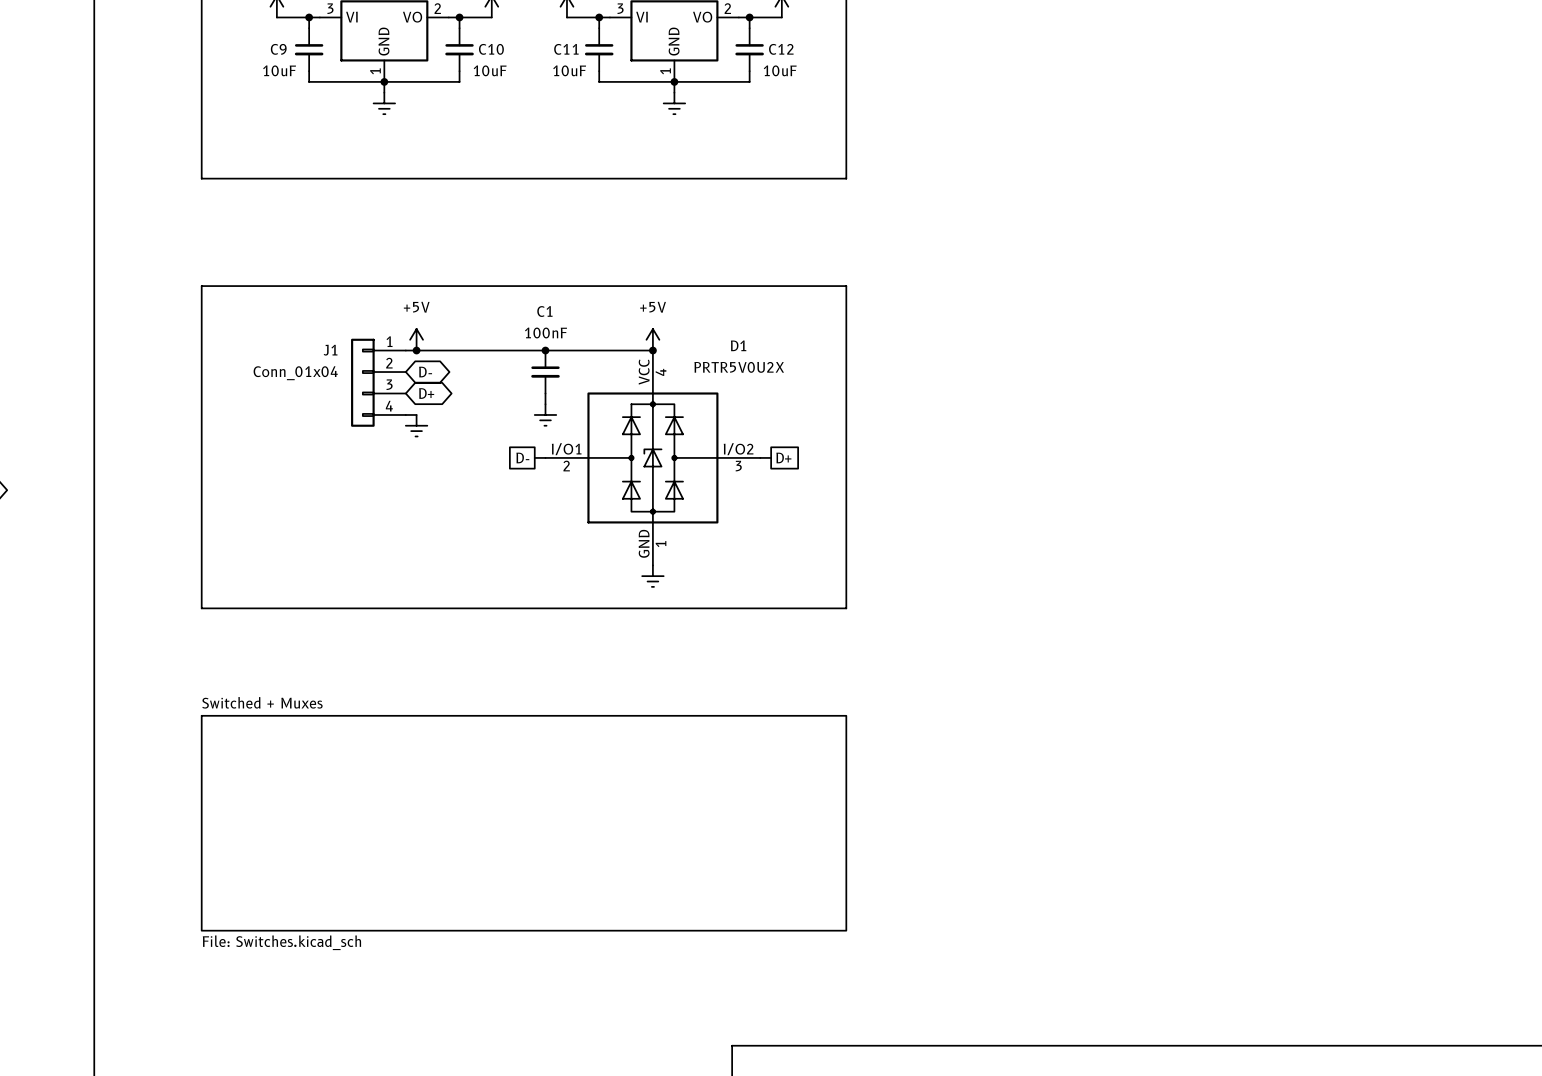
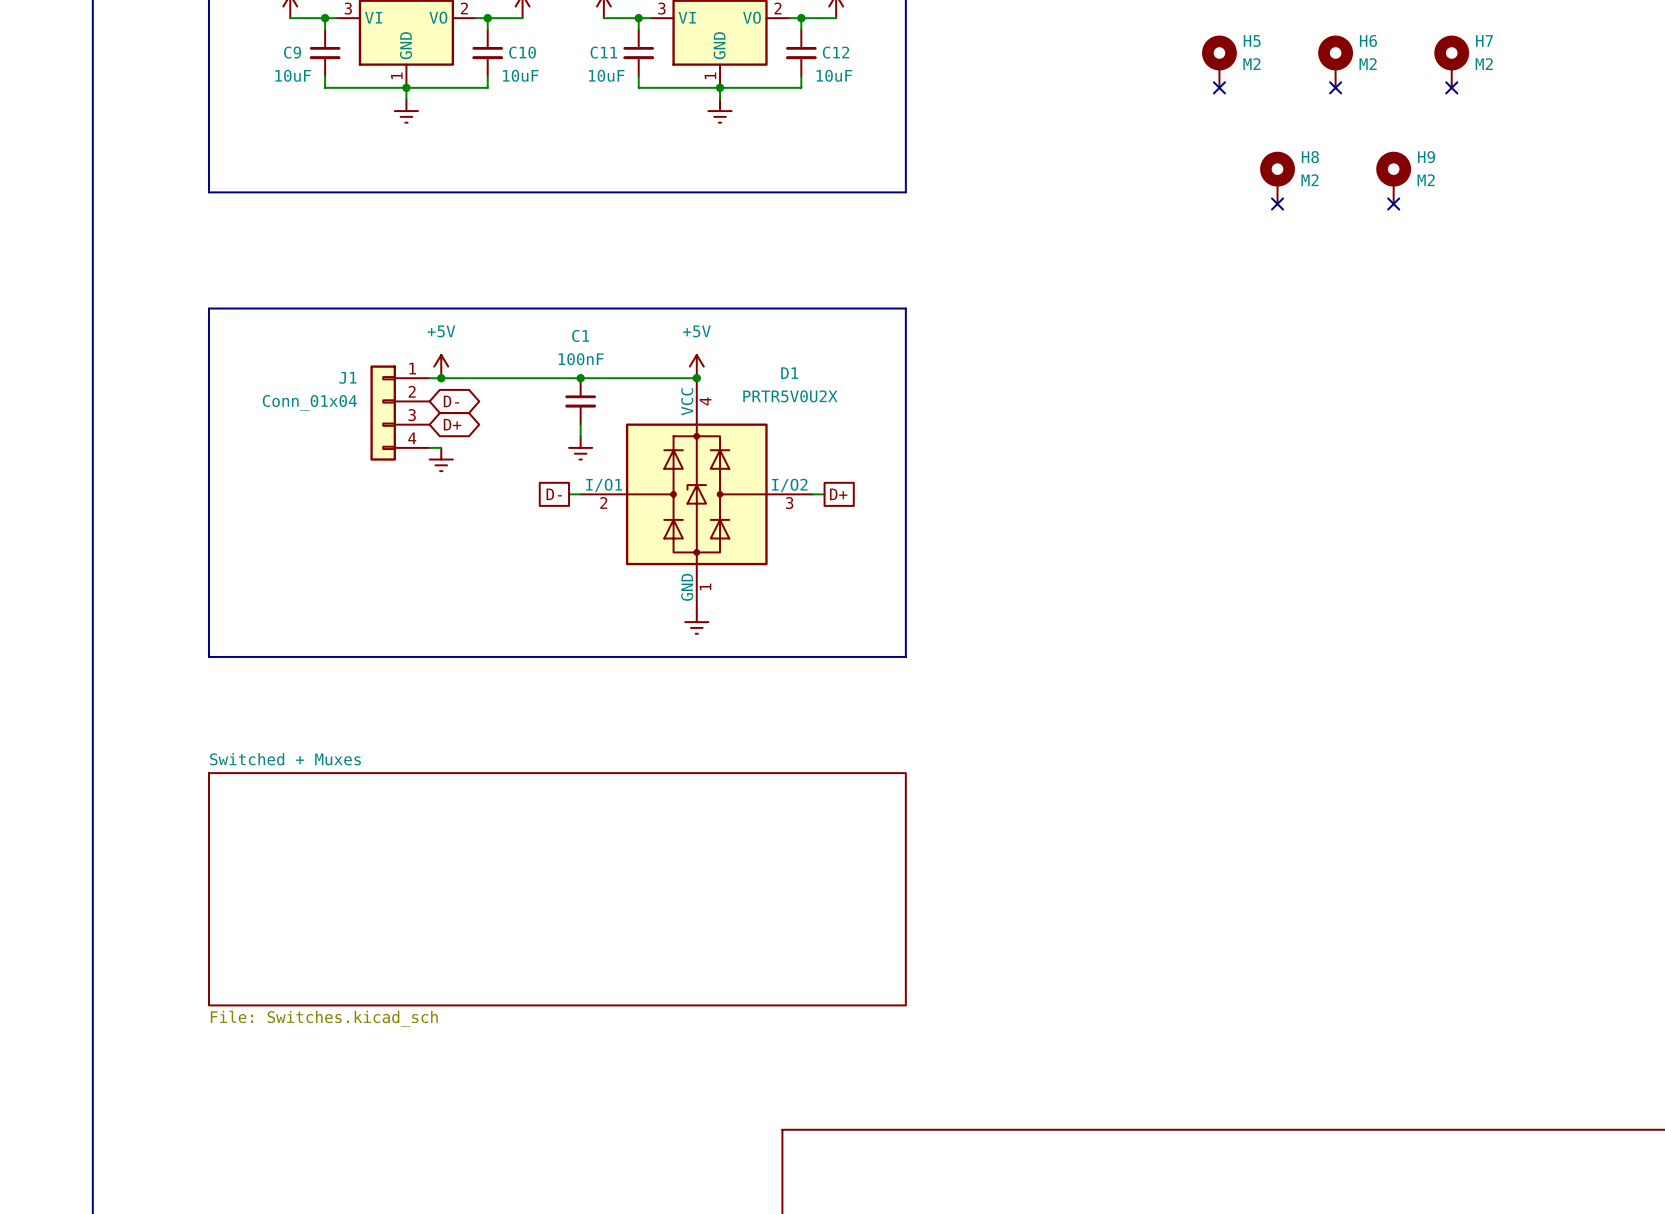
H5: none -> M2 (1219, 61)
H6: none -> M2 (1335, 61)
H7: none -> M2 (1451, 61)
no-connect mark: none -> (1219, 87)
no-connect mark: none -> (1335, 87)
no-connect mark: none -> (1451, 87)
H8: none -> M2 (1277, 177)
H9: none -> M2 (1393, 177)
no-connect mark: none -> (1277, 203)
no-connect mark: none -> (1393, 203)

